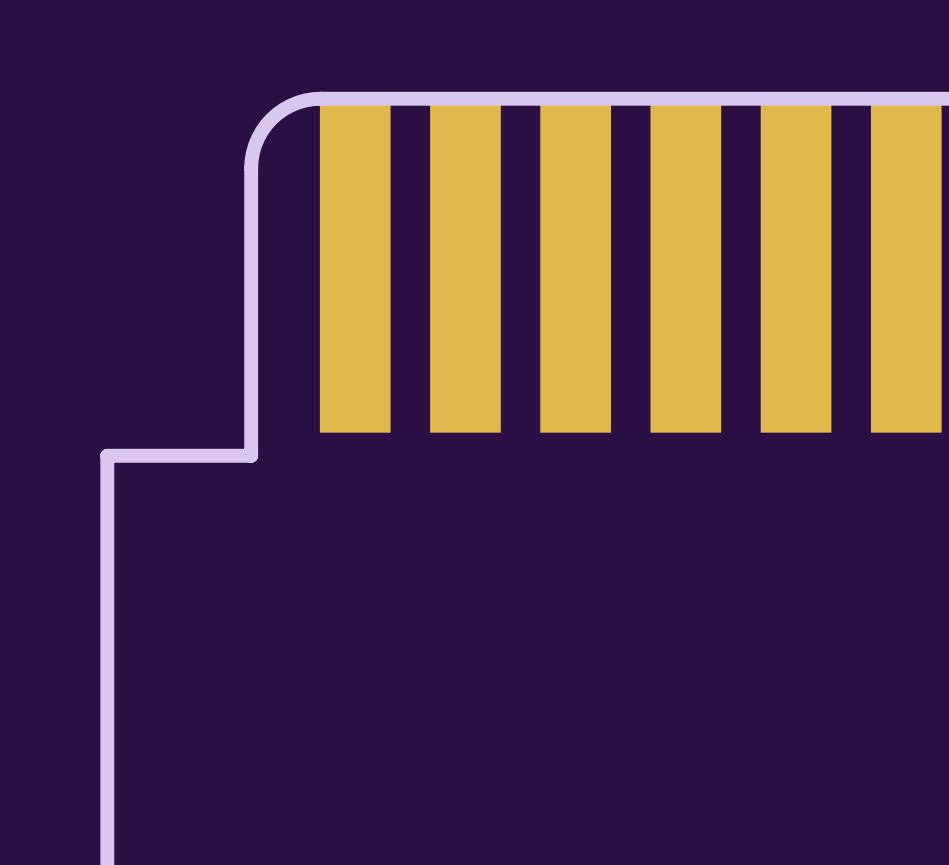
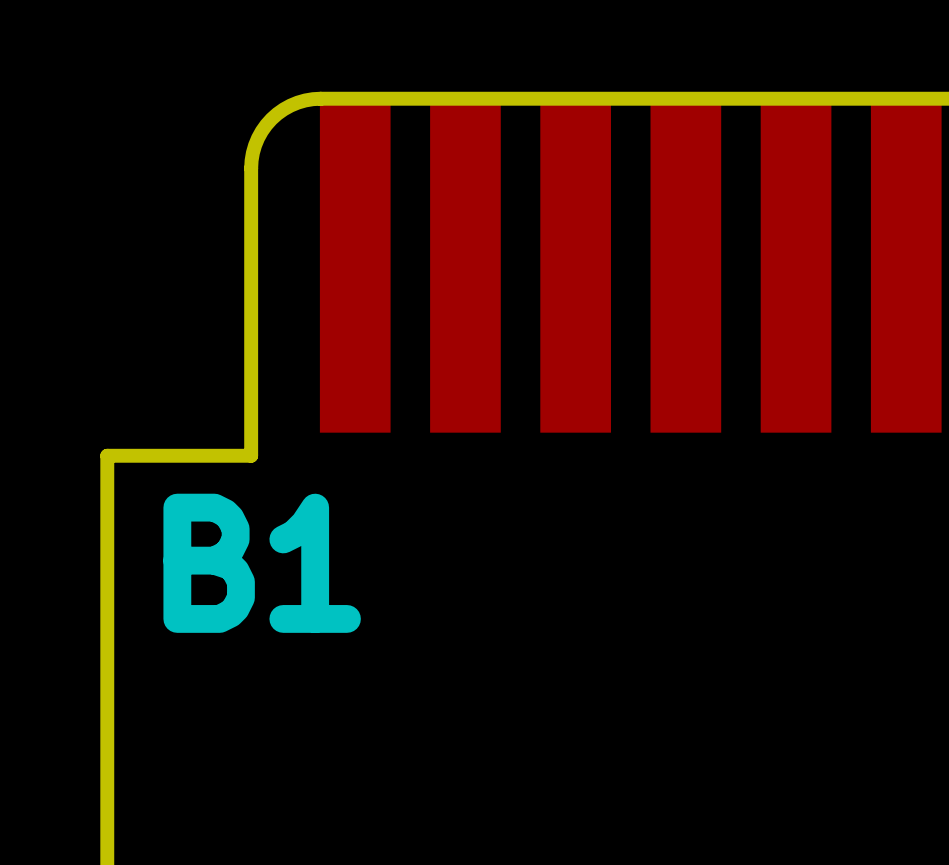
text: none -> B1 (262, 563)

